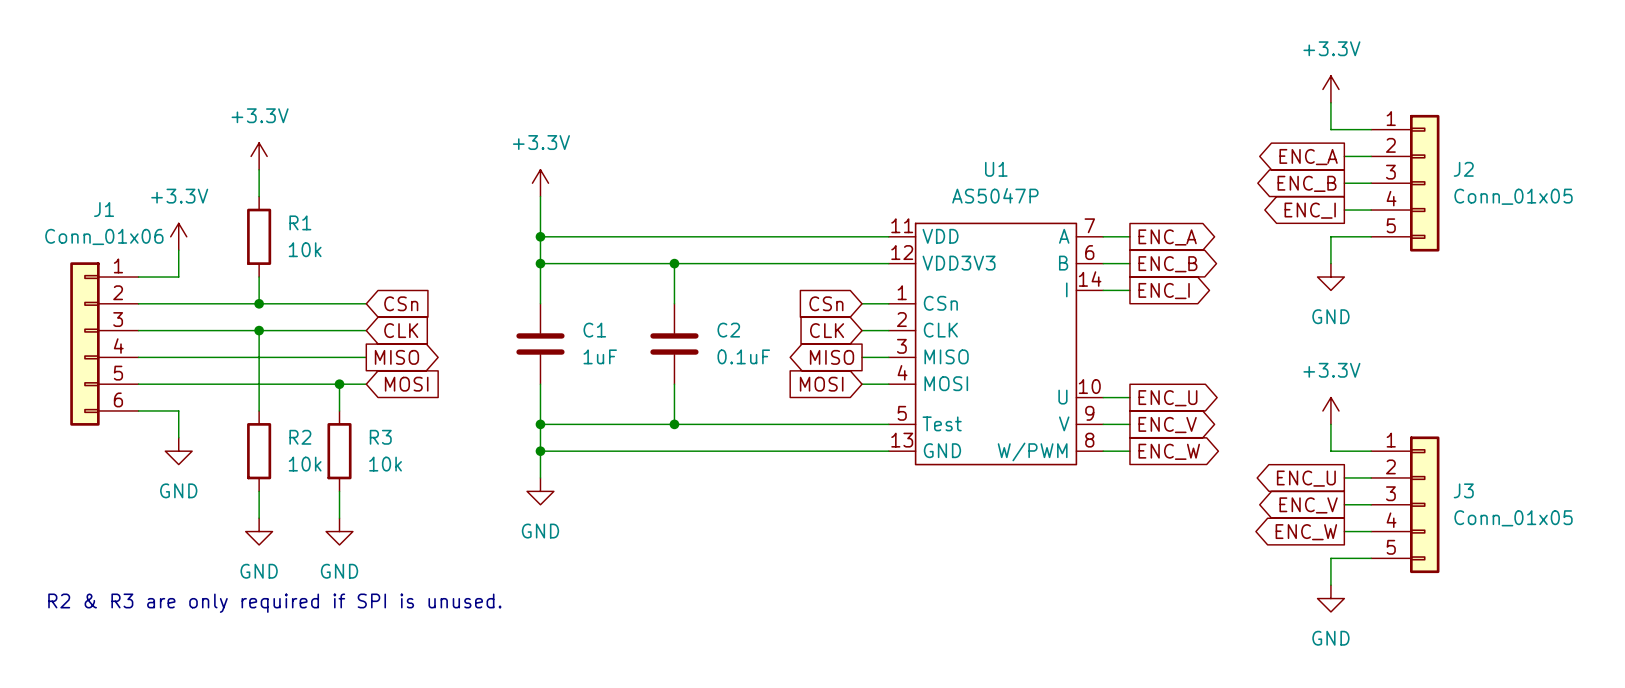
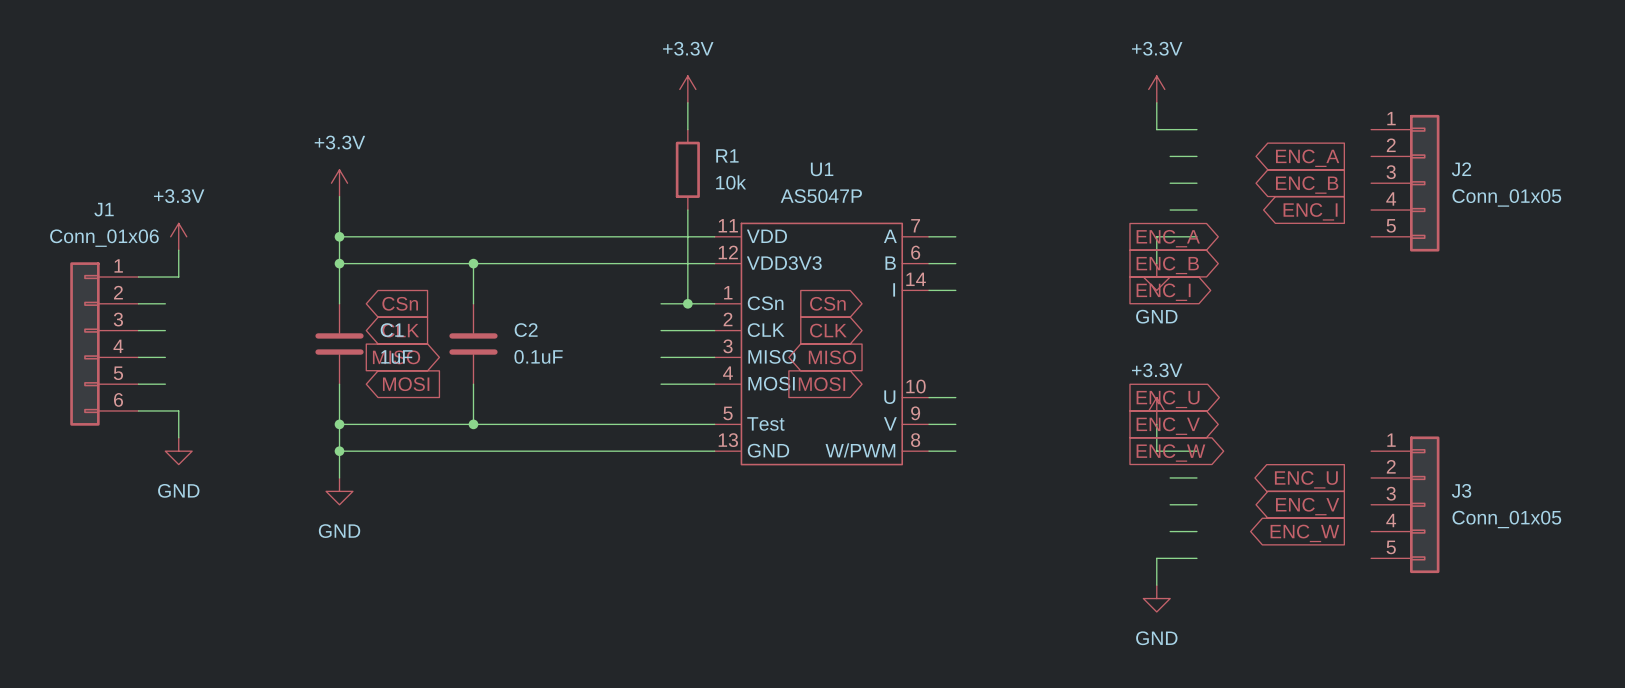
power symbol: none -> +3.3V (687, 89)
power symbol position: +3.3V (1330, 89) -> +3.3V (1156, 89)
wire: none -> (687, 102) (687, 129)
wire: (1330, 102) (1330, 129) (1371, 129) -> (1156, 102) (1156, 129) (1196, 129)
power symbol position: +3.3V (259, 156) -> +3.3V (339, 183)
wire: (1344, 156) (1371, 156) -> (1170, 156) (1196, 156)
wire: (259, 169) (259, 196) -> none
power symbol: +3.3V (540, 183) -> none
wire: (1344, 183) (1371, 183) -> (1170, 183) (1196, 183)
wire: (540, 196) (540, 303) -> (339, 196) (339, 303)
wire: (1344, 210) (1371, 210) -> (1170, 210) (1196, 210)
R1 position: (259, 236) -> (687, 169)
junction: none -> (339, 236)
junction: (540, 236) -> none
wire: (714, 236) (888, 236) -> none
wire: (1103, 236) (1129, 236) -> (929, 236) (955, 236)
wire: (1371, 236) (1330, 236) (1330, 263) -> (1196, 236) (1156, 236) (1156, 263)
junction: none -> (339, 263)
junction: none -> (473, 263)
junction: (540, 263) -> none
wire: (674, 263) (674, 303) -> (473, 263) (473, 303)
junction position: (674, 263) -> (687, 303)
wire: (714, 263) (888, 263) -> none
wire: (1103, 263) (1129, 263) -> (929, 263) (955, 263)
wire: (259, 277) (259, 303) -> none
power symbol position: GND (1330, 277) -> GND (1156, 277)
wire: (1103, 290) (1129, 290) -> (929, 290) (955, 290)
wire: (165, 303) (366, 303) -> (339, 236) (540, 236)
junction: (259, 303) -> none
wire: none -> (661, 303) (714, 303)
wire: (862, 303) (888, 303) -> none
wire: (165, 330) (366, 330) -> (339, 263) (540, 263)
wire: (259, 330) (259, 410) -> none
junction: (259, 330) -> none
wire: none -> (661, 330) (714, 330)
wire: (862, 330) (888, 330) -> none
C1 position: (540, 343) -> (339, 343)
C2 position: (674, 343) -> (473, 343)
U1 position: (996, 343) -> (821, 343)
wire: (165, 357) (366, 357) -> (339, 424) (540, 424)
wire: none -> (661, 357) (714, 357)
wire: (862, 357) (888, 357) -> none
wire: (165, 384) (366, 384) -> (339, 451) (540, 451)
junction: (339, 384) -> none
wire: (540, 384) (540, 477) -> (687, 210) (687, 303)
wire: none -> (661, 384) (714, 384)
wire: (674, 384) (674, 424) -> (473, 384) (473, 424)
wire: (862, 384) (888, 384) -> none
wire: (1103, 397) (1129, 397) -> (929, 397) (955, 397)
wire: none -> (339, 410) (339, 477)
power symbol position: +3.3V (1330, 410) -> +3.3V (1156, 410)
junction: none -> (339, 424)
junction: none -> (473, 424)
junction: (540, 424) -> none
junction: (674, 424) -> none
wire: (714, 424) (888, 424) -> none
wire: (1103, 424) (1129, 424) -> (929, 424) (955, 424)
wire: (1330, 424) (1330, 451) (1371, 451) -> (1156, 424) (1156, 451) (1196, 451)
R2: 10k (259, 451) -> none
junction: none -> (339, 451)
R3: 10k (339, 451) -> none
junction: (540, 451) -> none
wire: (714, 451) (888, 451) -> none
wire: (1103, 451) (1129, 451) -> (929, 451) (955, 451)
wire: (1344, 477) (1371, 477) -> (1170, 477) (1196, 477)
wire: (259, 491) (259, 518) -> none
wire: (339, 491) (339, 518) -> none
power symbol: GND (540, 491) -> none
wire: (1344, 504) (1371, 504) -> (1170, 504) (1196, 504)
power symbol: GND (259, 531) -> none
power symbol position: GND (339, 531) -> GND (339, 491)
wire: (1344, 531) (1371, 531) -> (1170, 531) (1196, 531)
wire: (1371, 558) (1330, 558) (1330, 585) -> (1196, 558) (1156, 558) (1156, 585)
power symbol position: GND (1330, 598) -> GND (1156, 598)
text: R2 & R3 are only required if SPI is unused. (274, 603) -> none

